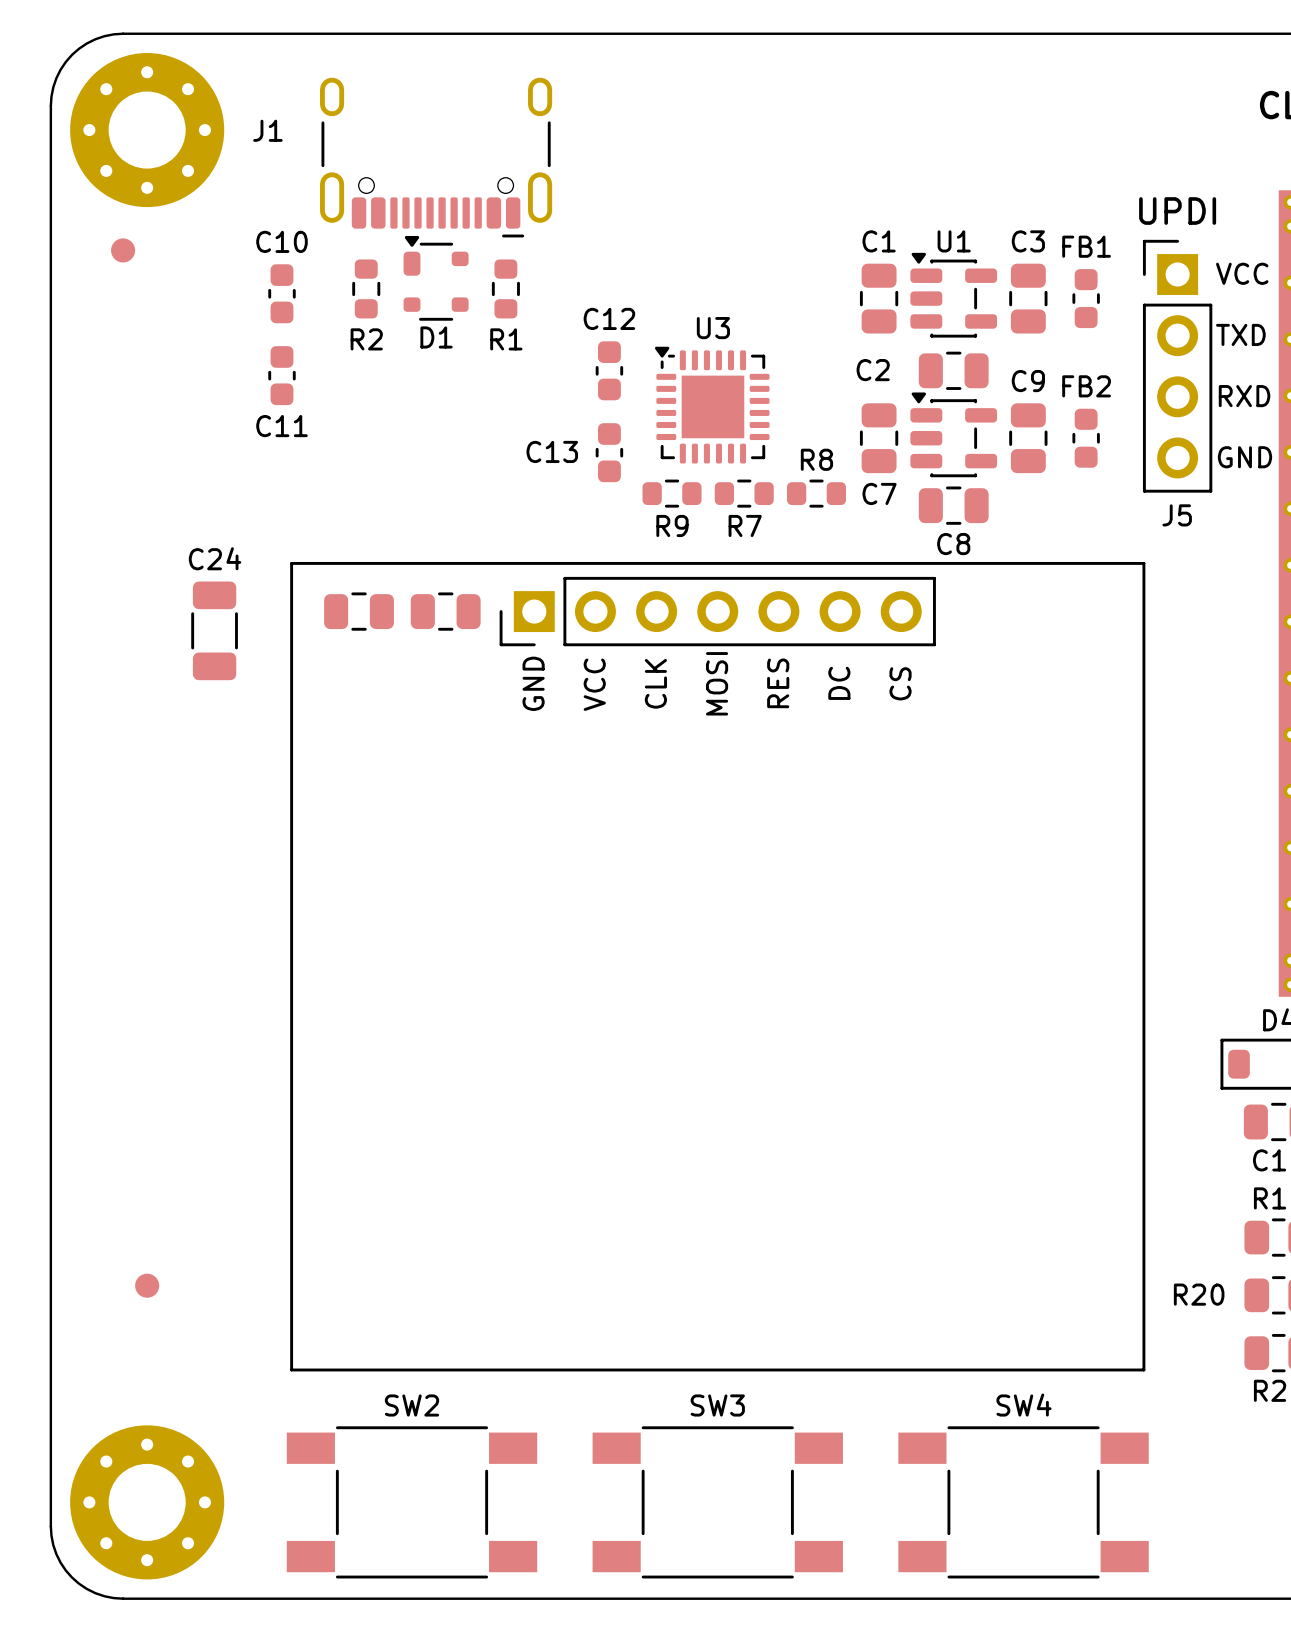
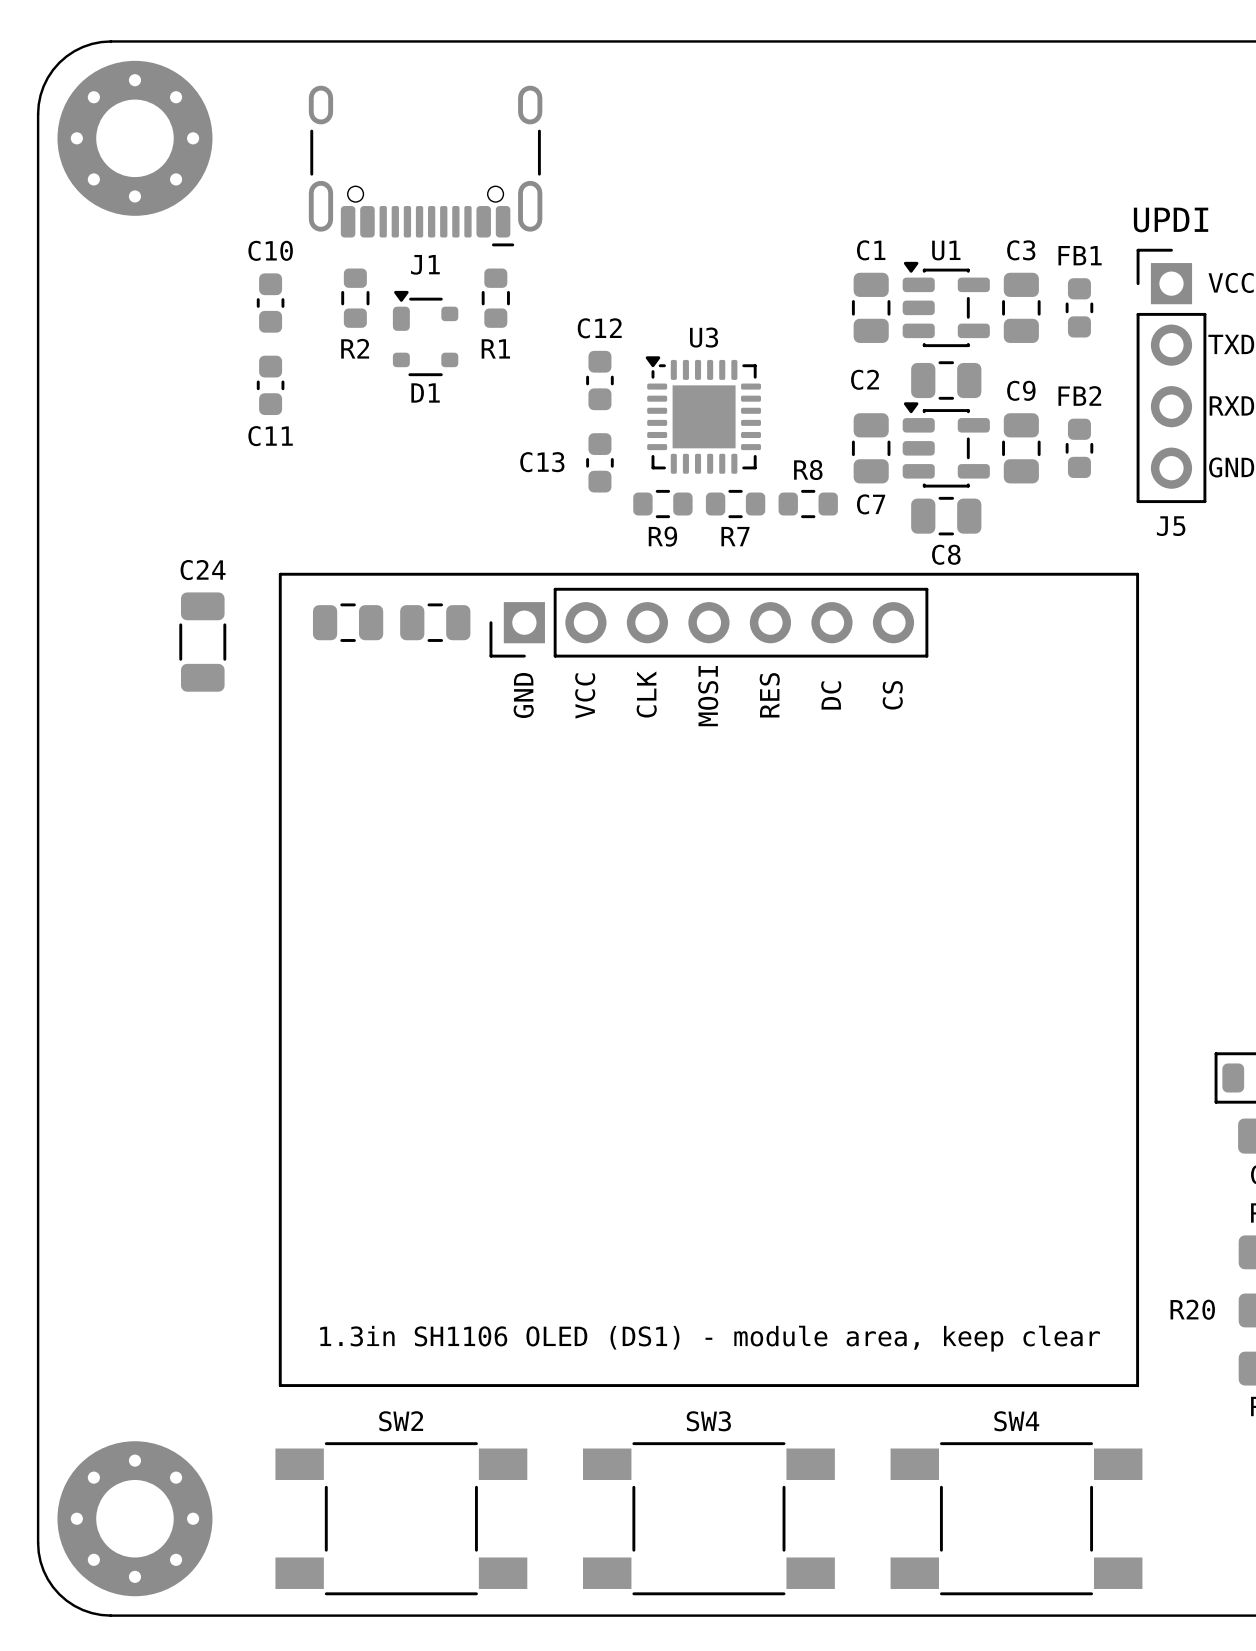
J1 name position: J1 (267, 130) -> J1 (425, 264)
part: (123, 250) -> none
D1 position: (436, 278) -> (425, 333)
part: (147, 1285) -> none
text: none -> 1.3in SH1106 OLED (DS1) - module area, keep clear (710, 1338)

